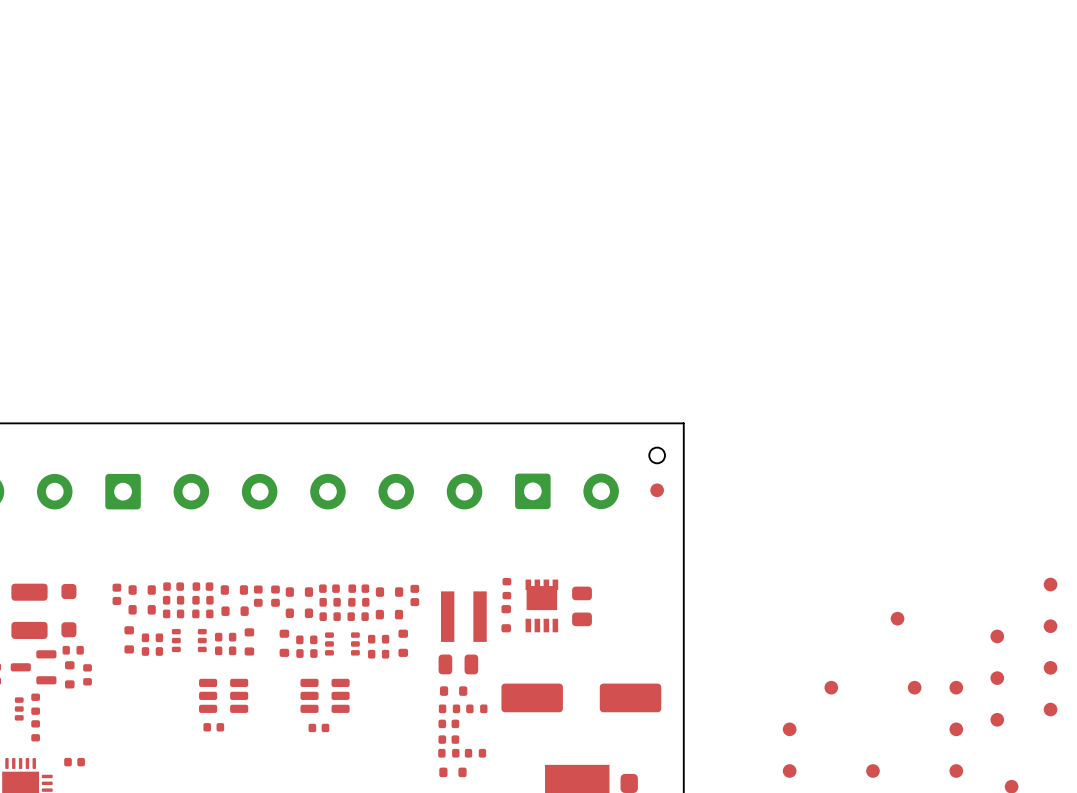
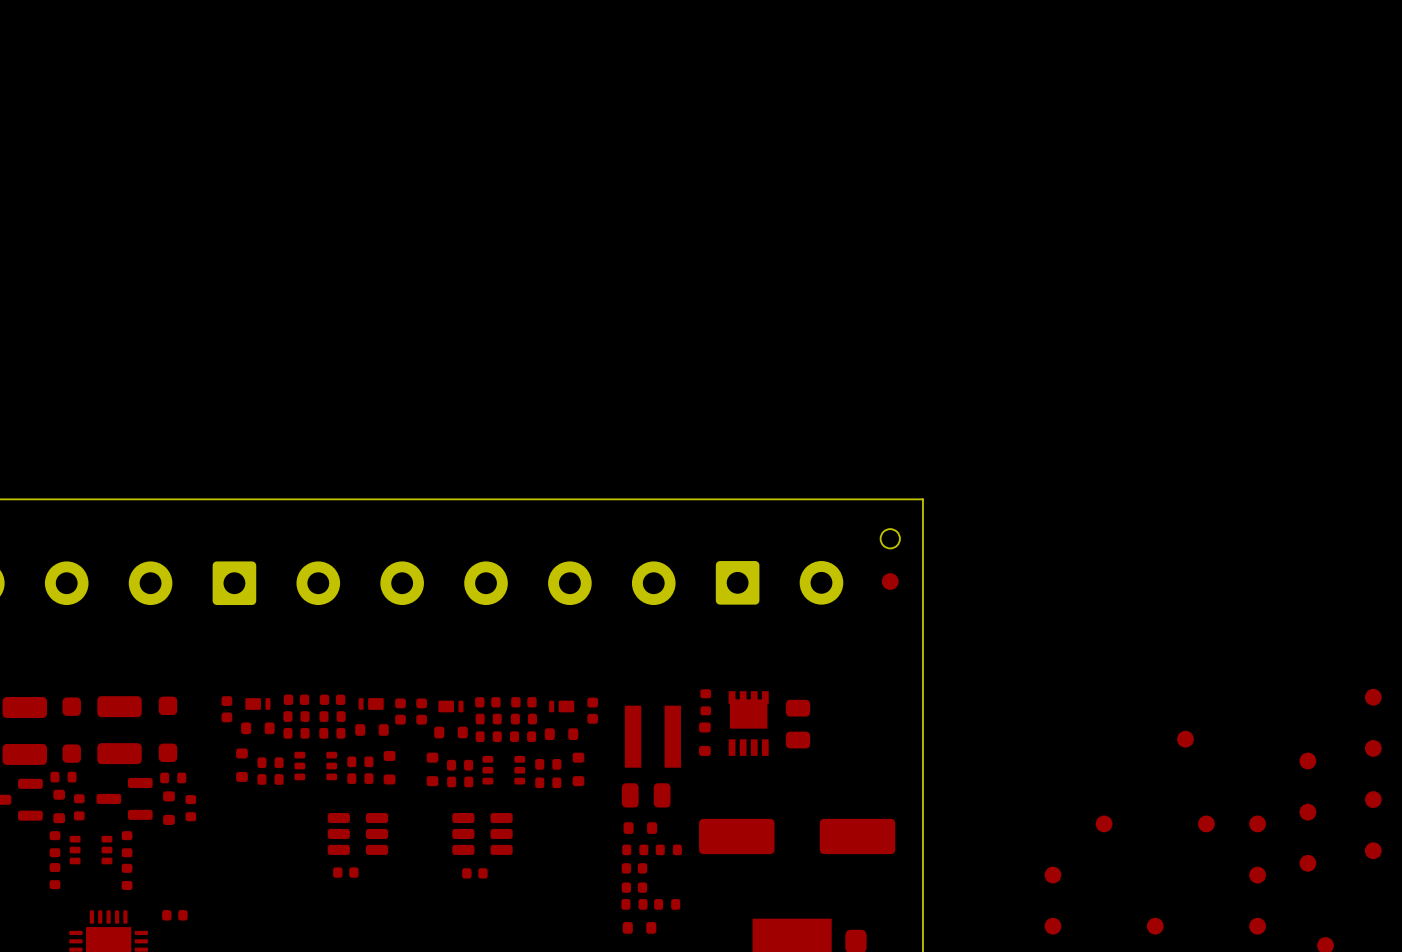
part footprint: [128, 585, 156, 595] -> [245, 698, 271, 710]
part footprint: [220, 585, 249, 595] -> [358, 698, 384, 710]
part footprint: [285, 587, 314, 597] -> [438, 700, 464, 713]
part footprint: [375, 587, 404, 597] -> [549, 700, 575, 713]

